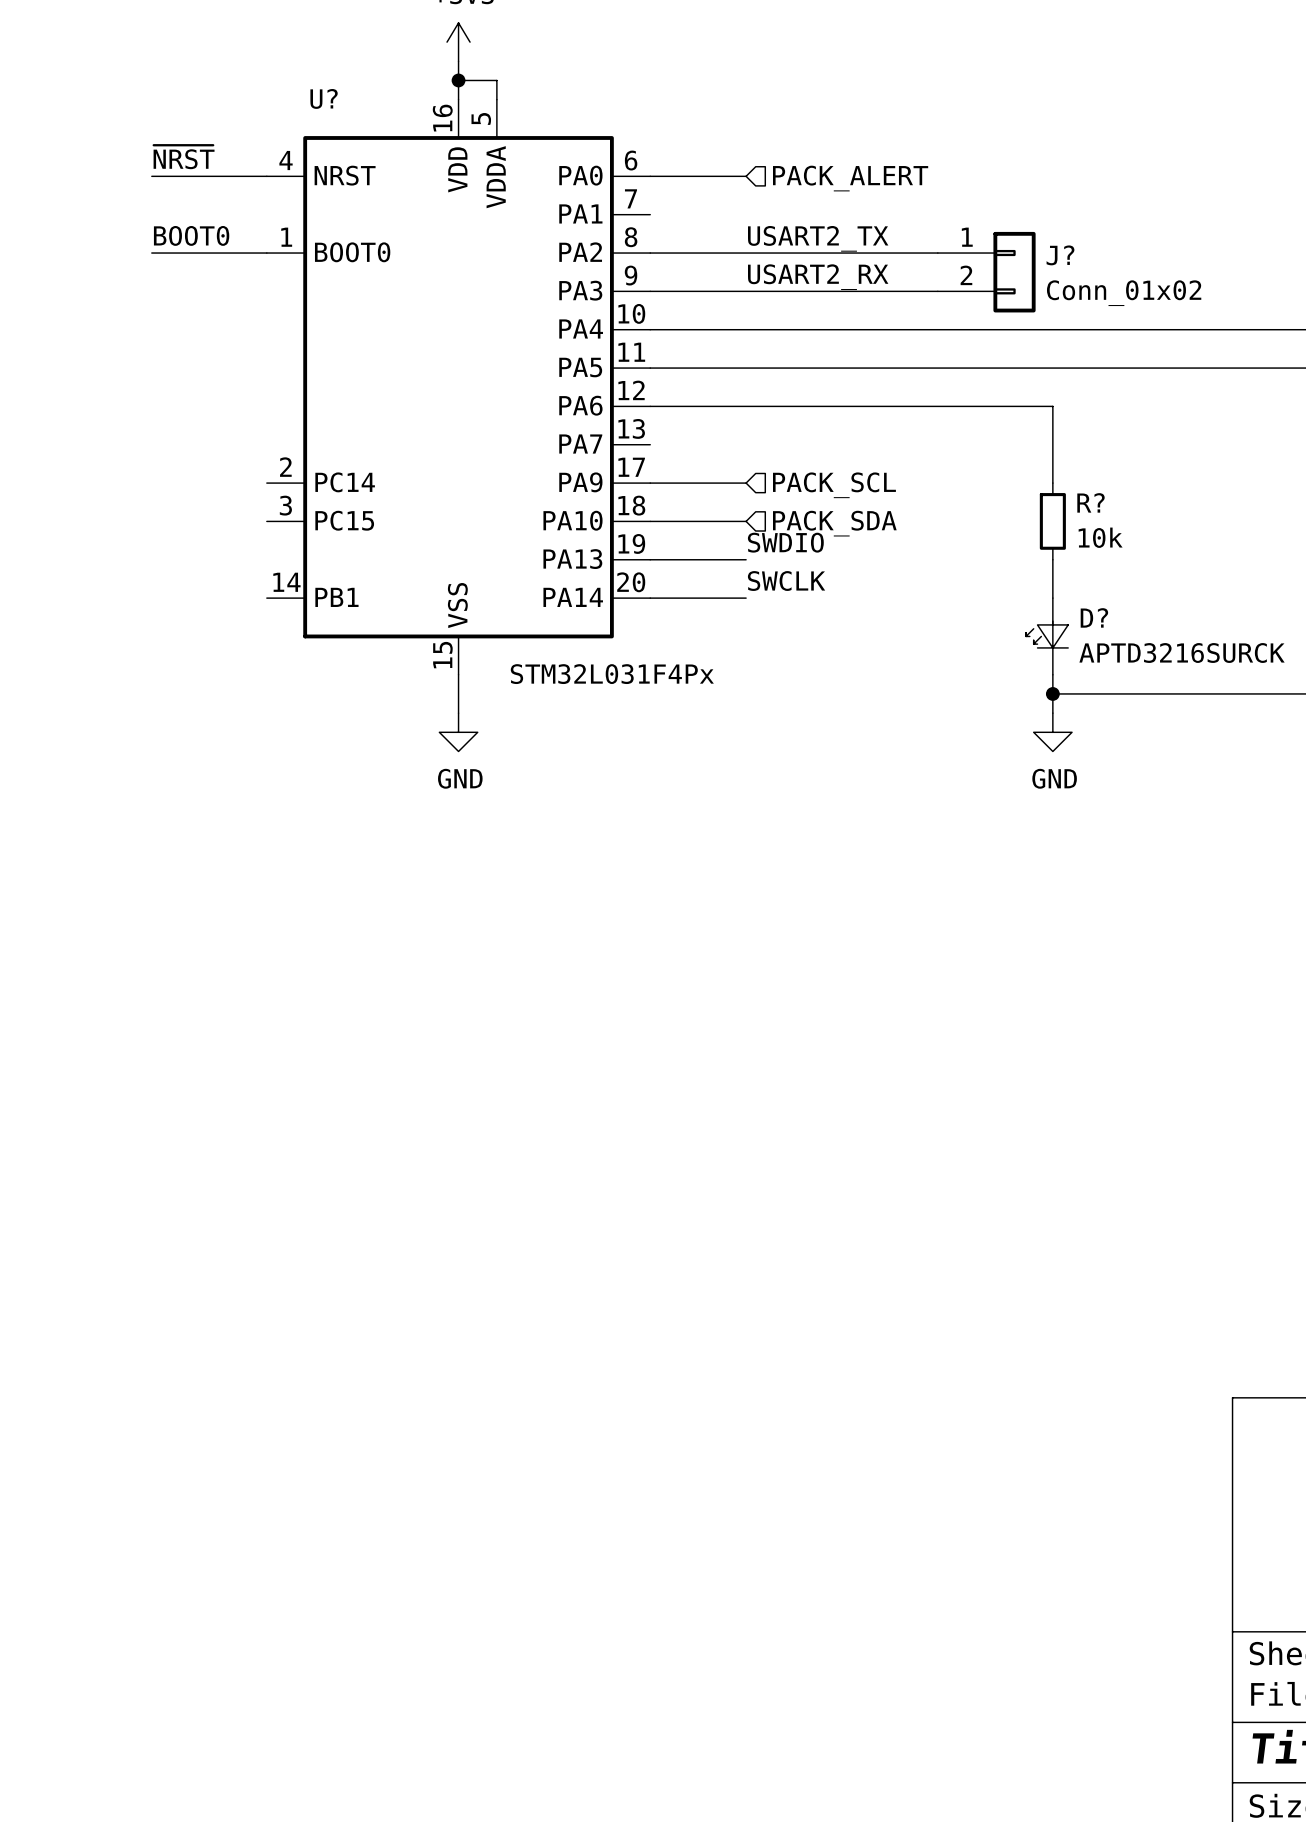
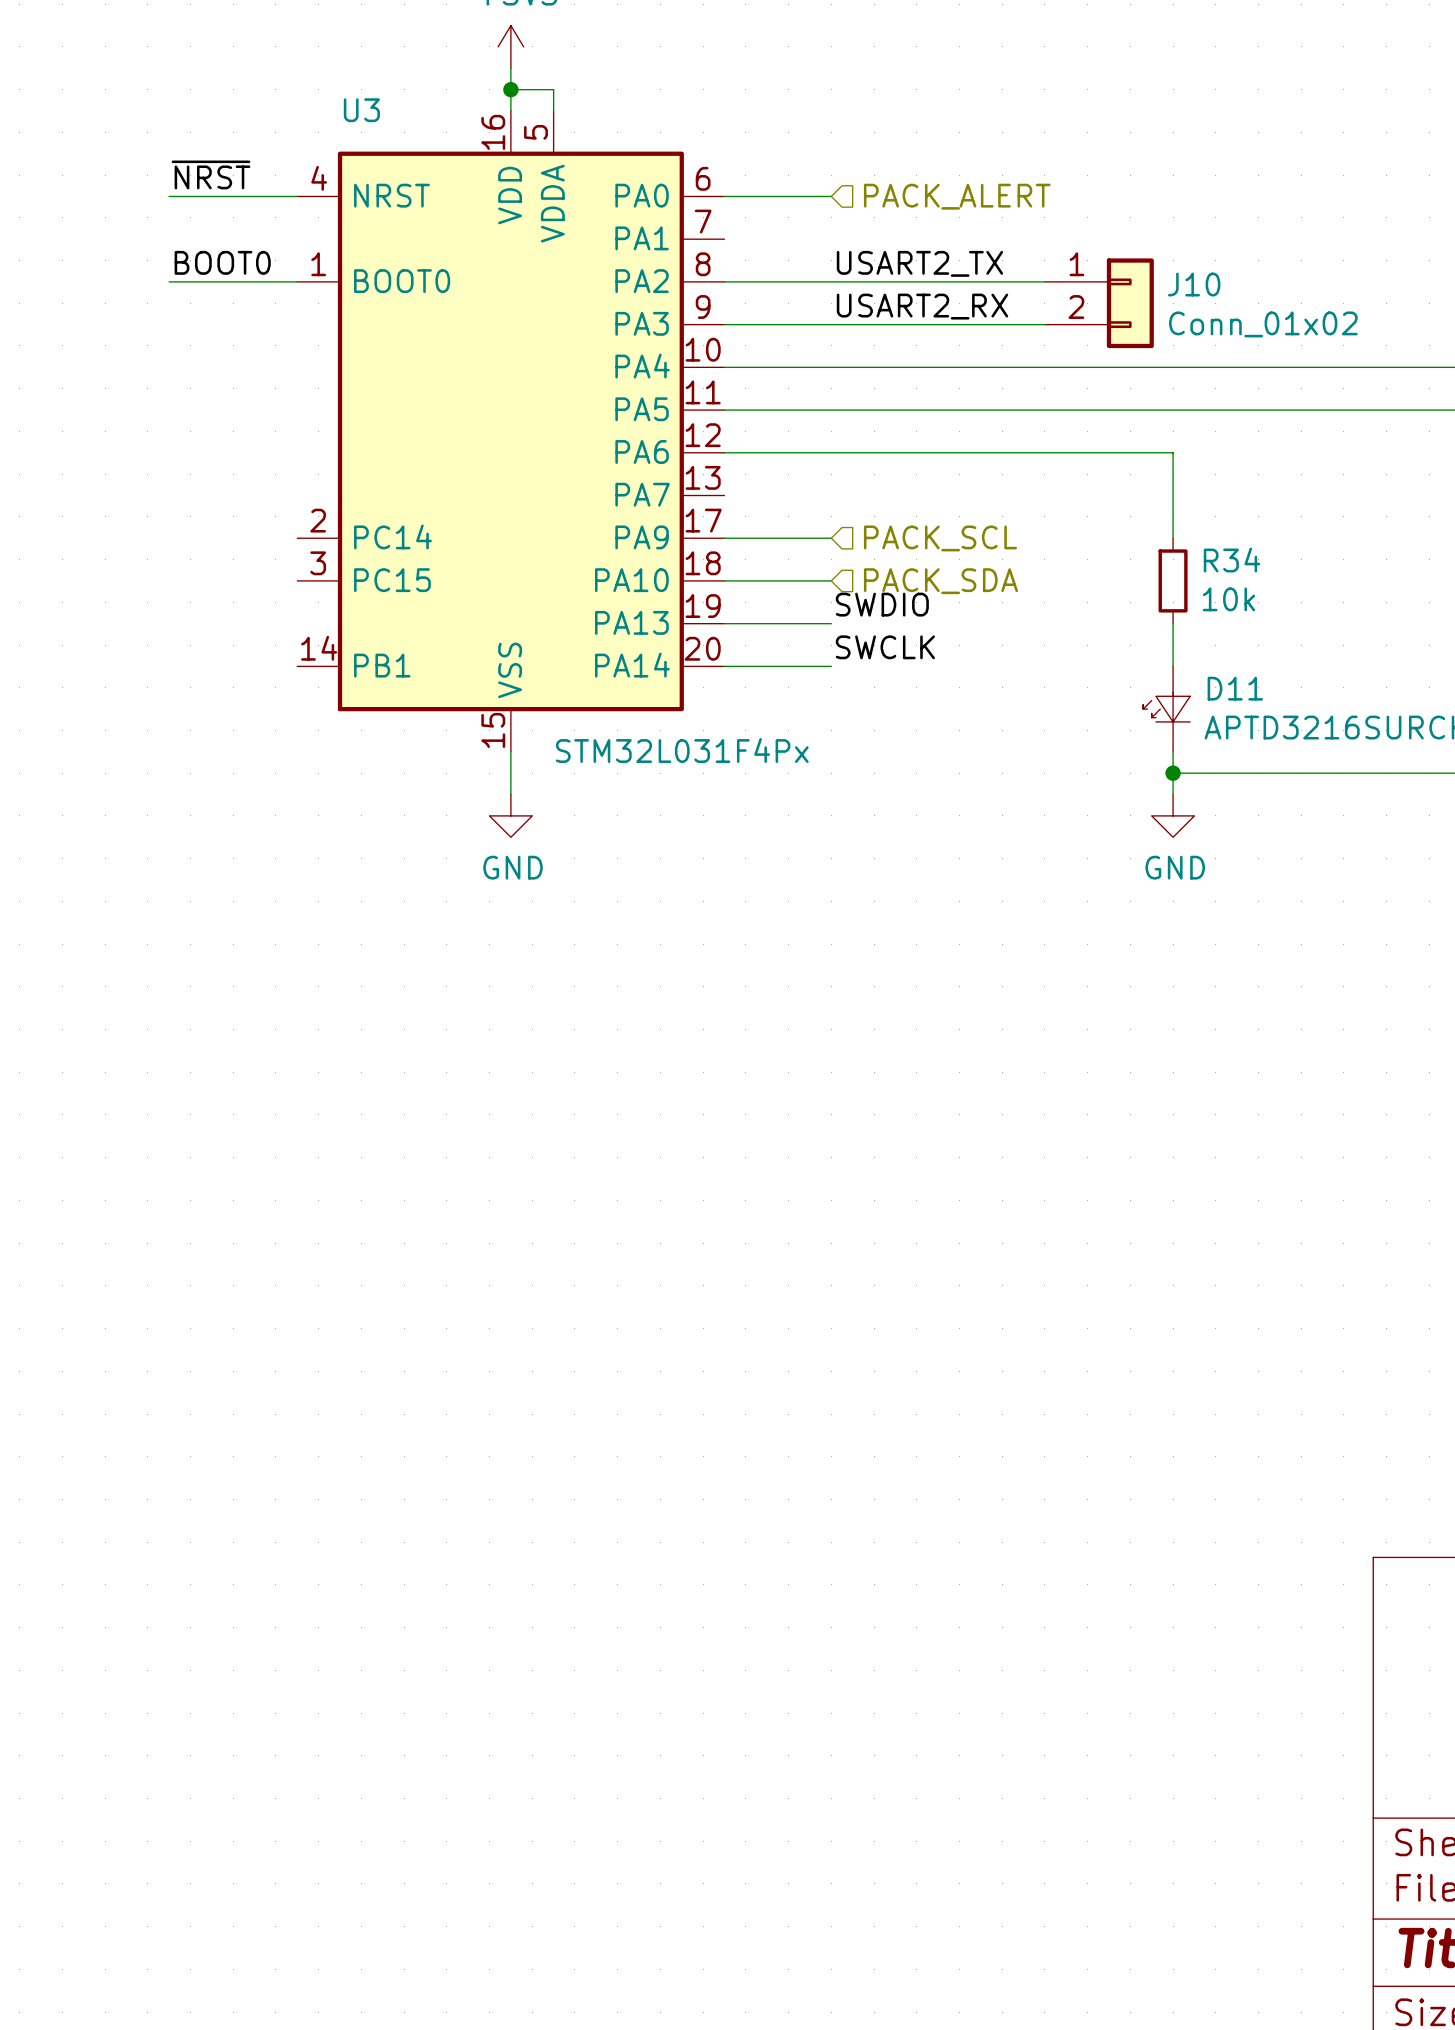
U? name: U? (324, 98) -> U3 (361, 110)
J? name: J? (1060, 255) -> J10 (1194, 284)
R? name: R? (1091, 502) -> R34 (1232, 559)
D? name: D? (1094, 617) -> D11 (1235, 688)

